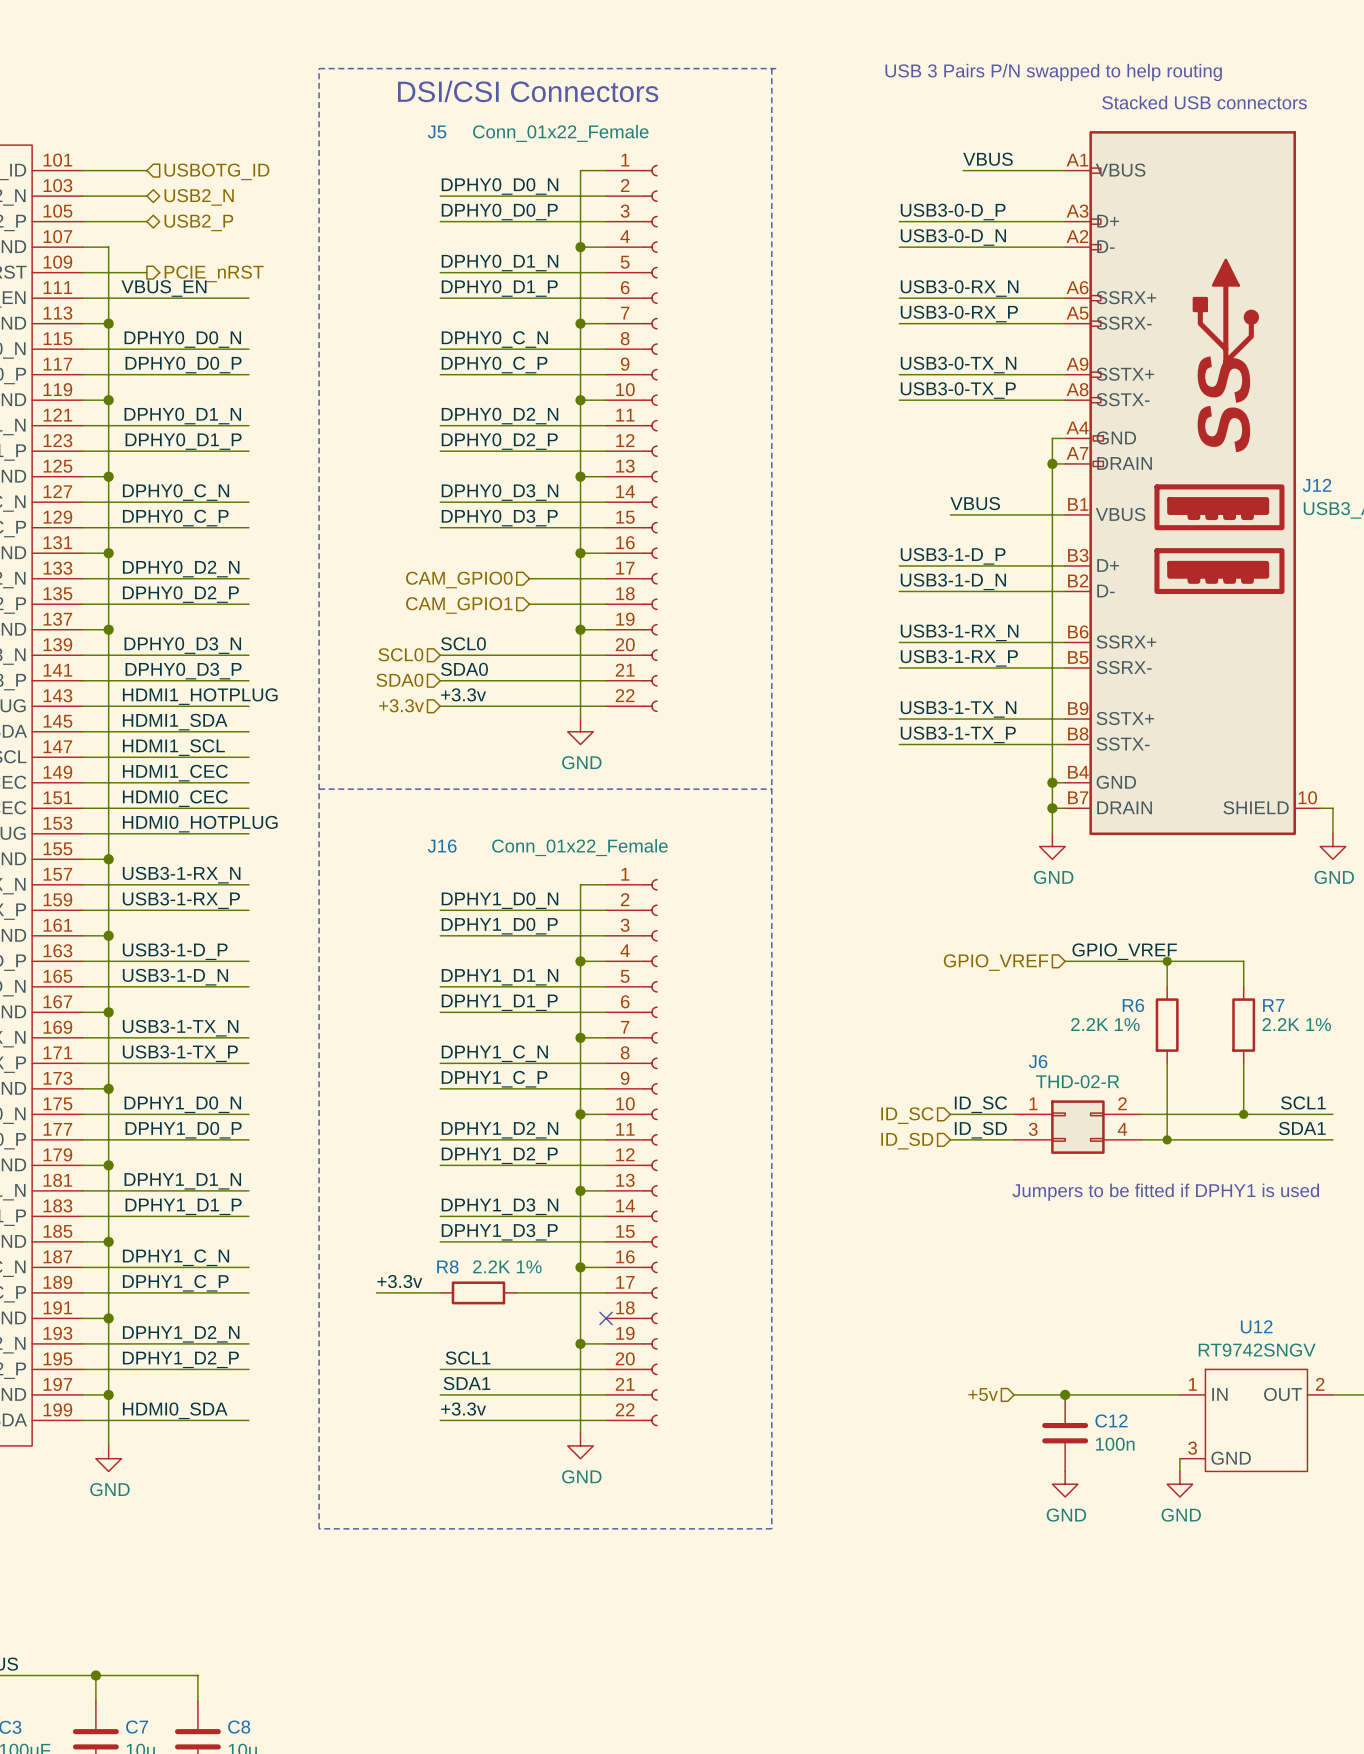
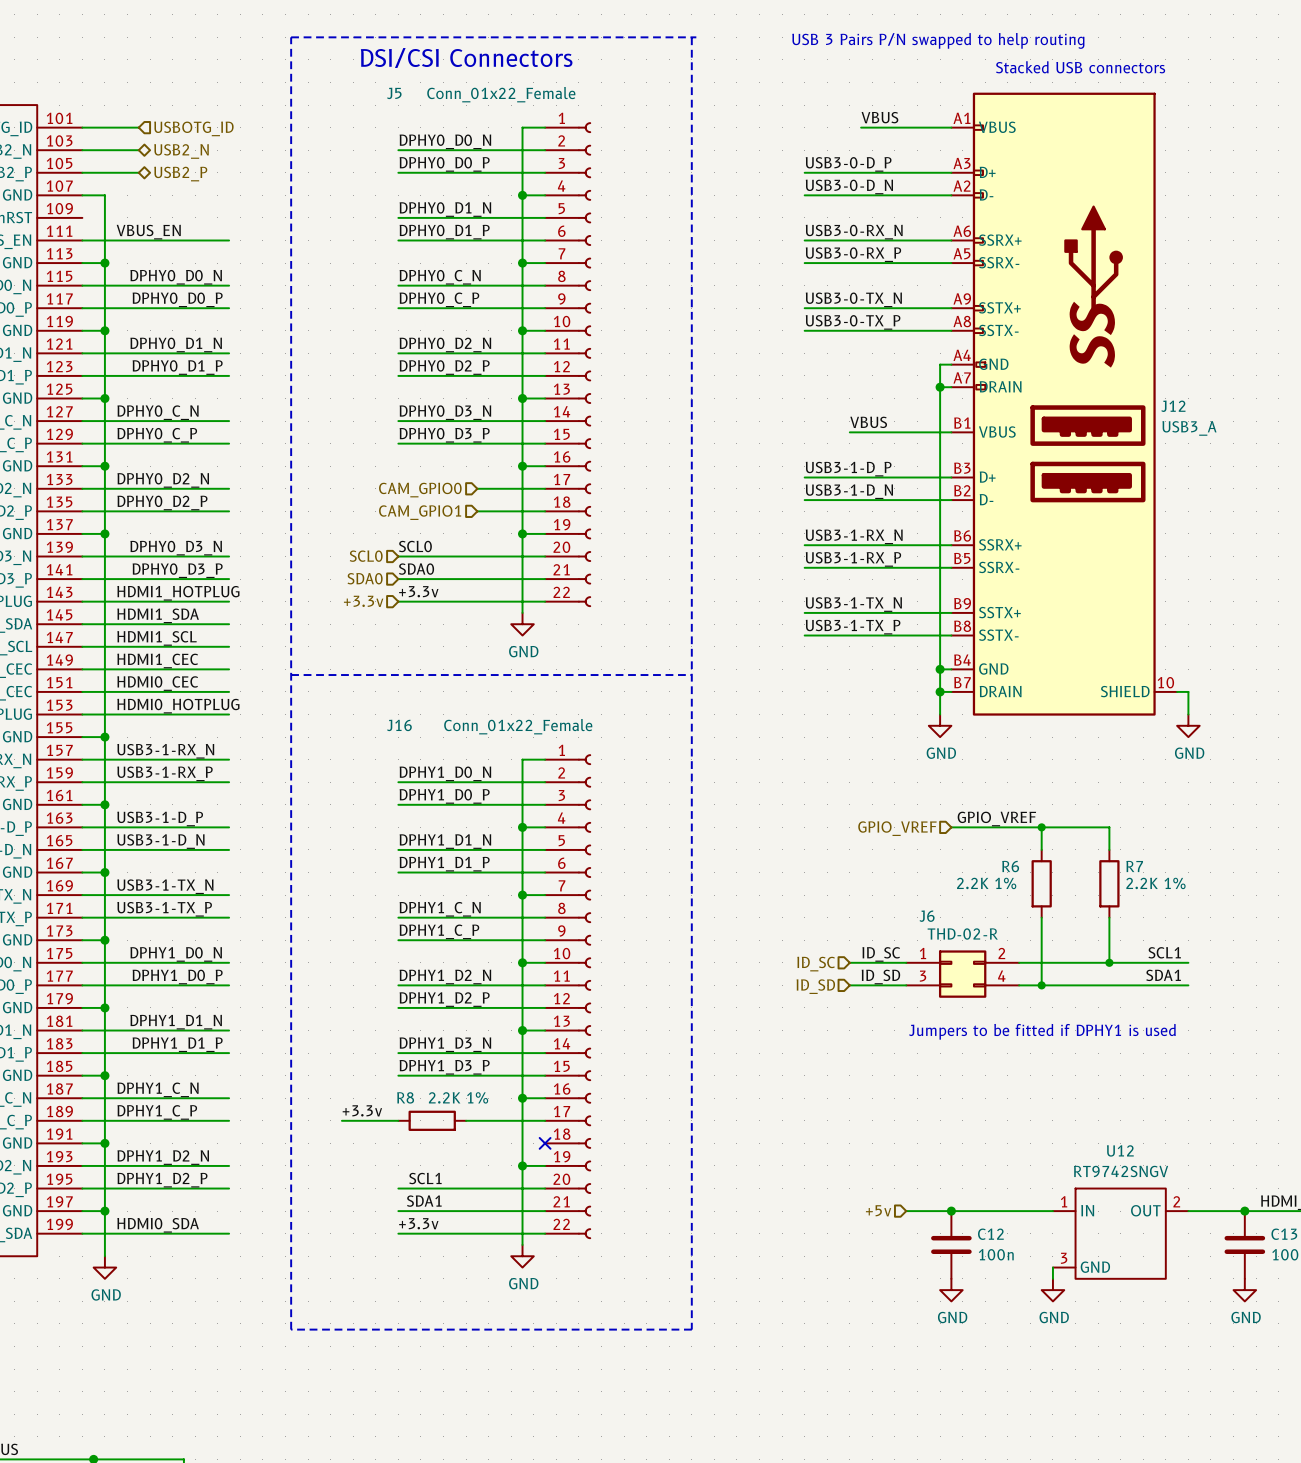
wire: (83, 272) (146, 272) -> none
hierarchical label: PCIE_nRST (214, 273) -> none

